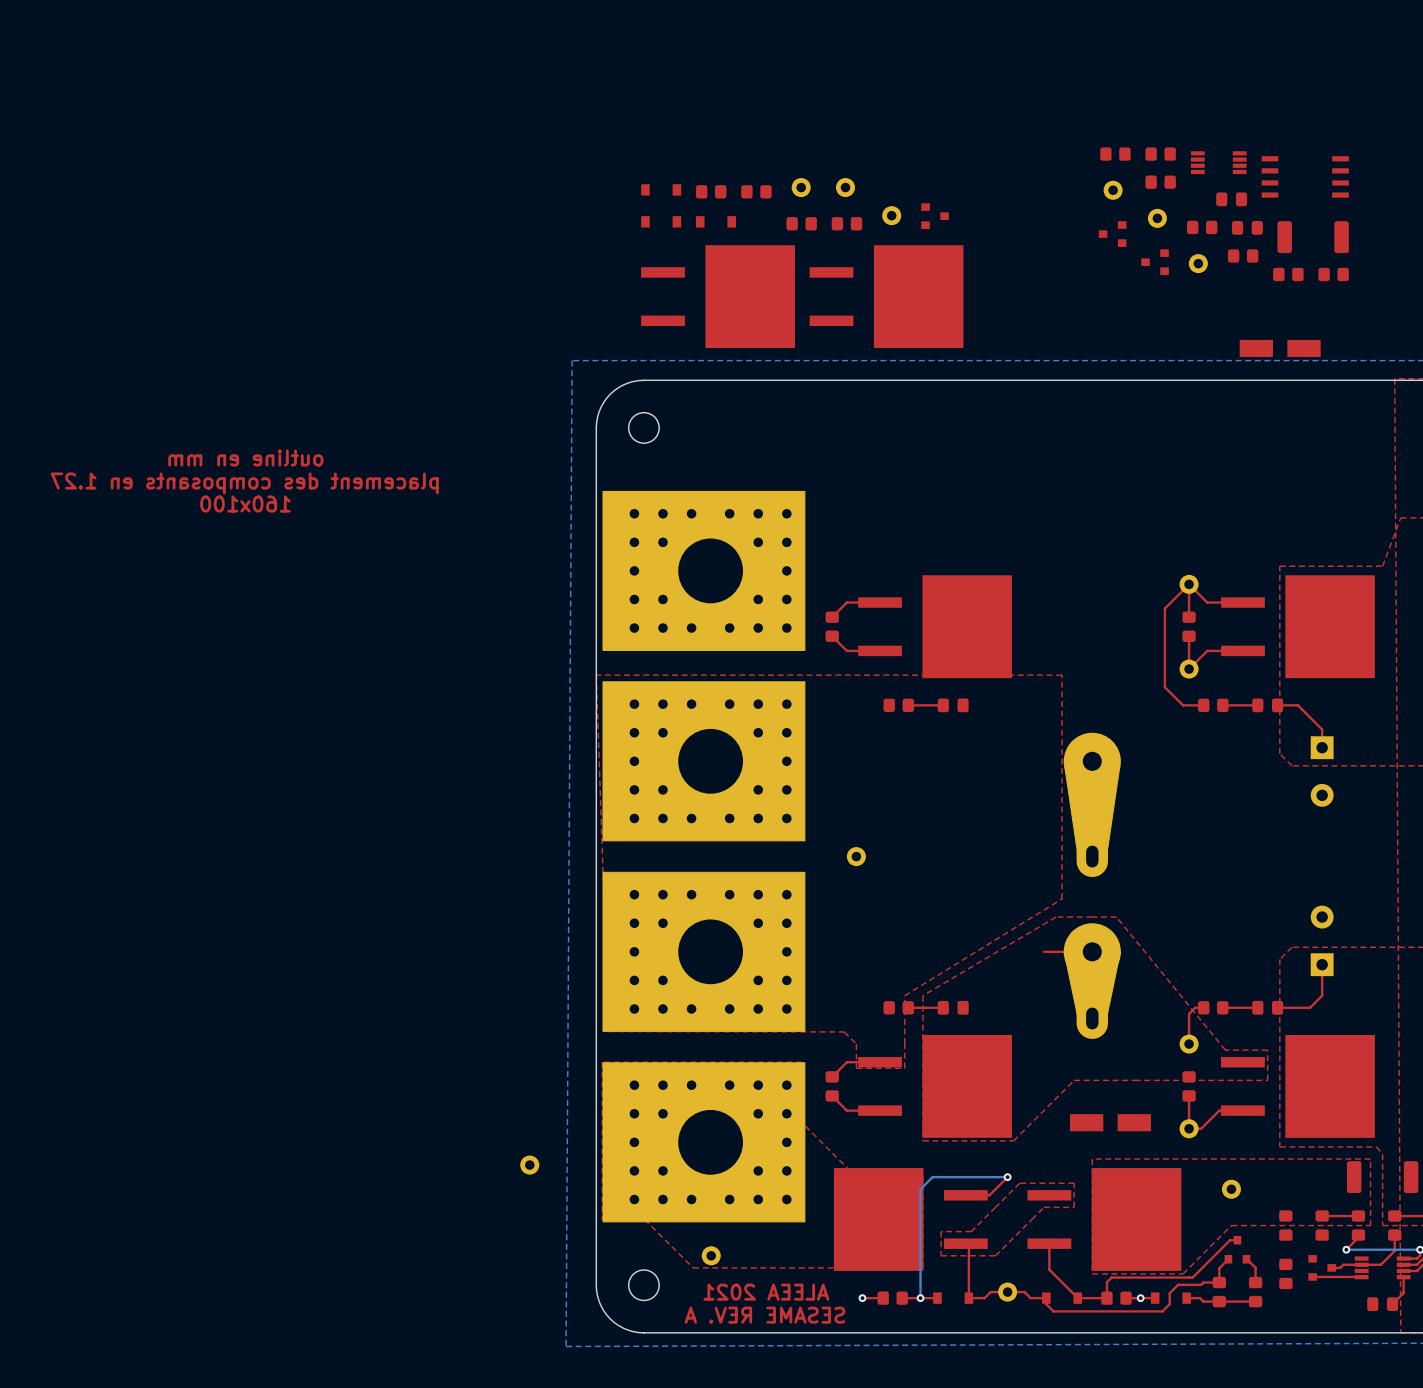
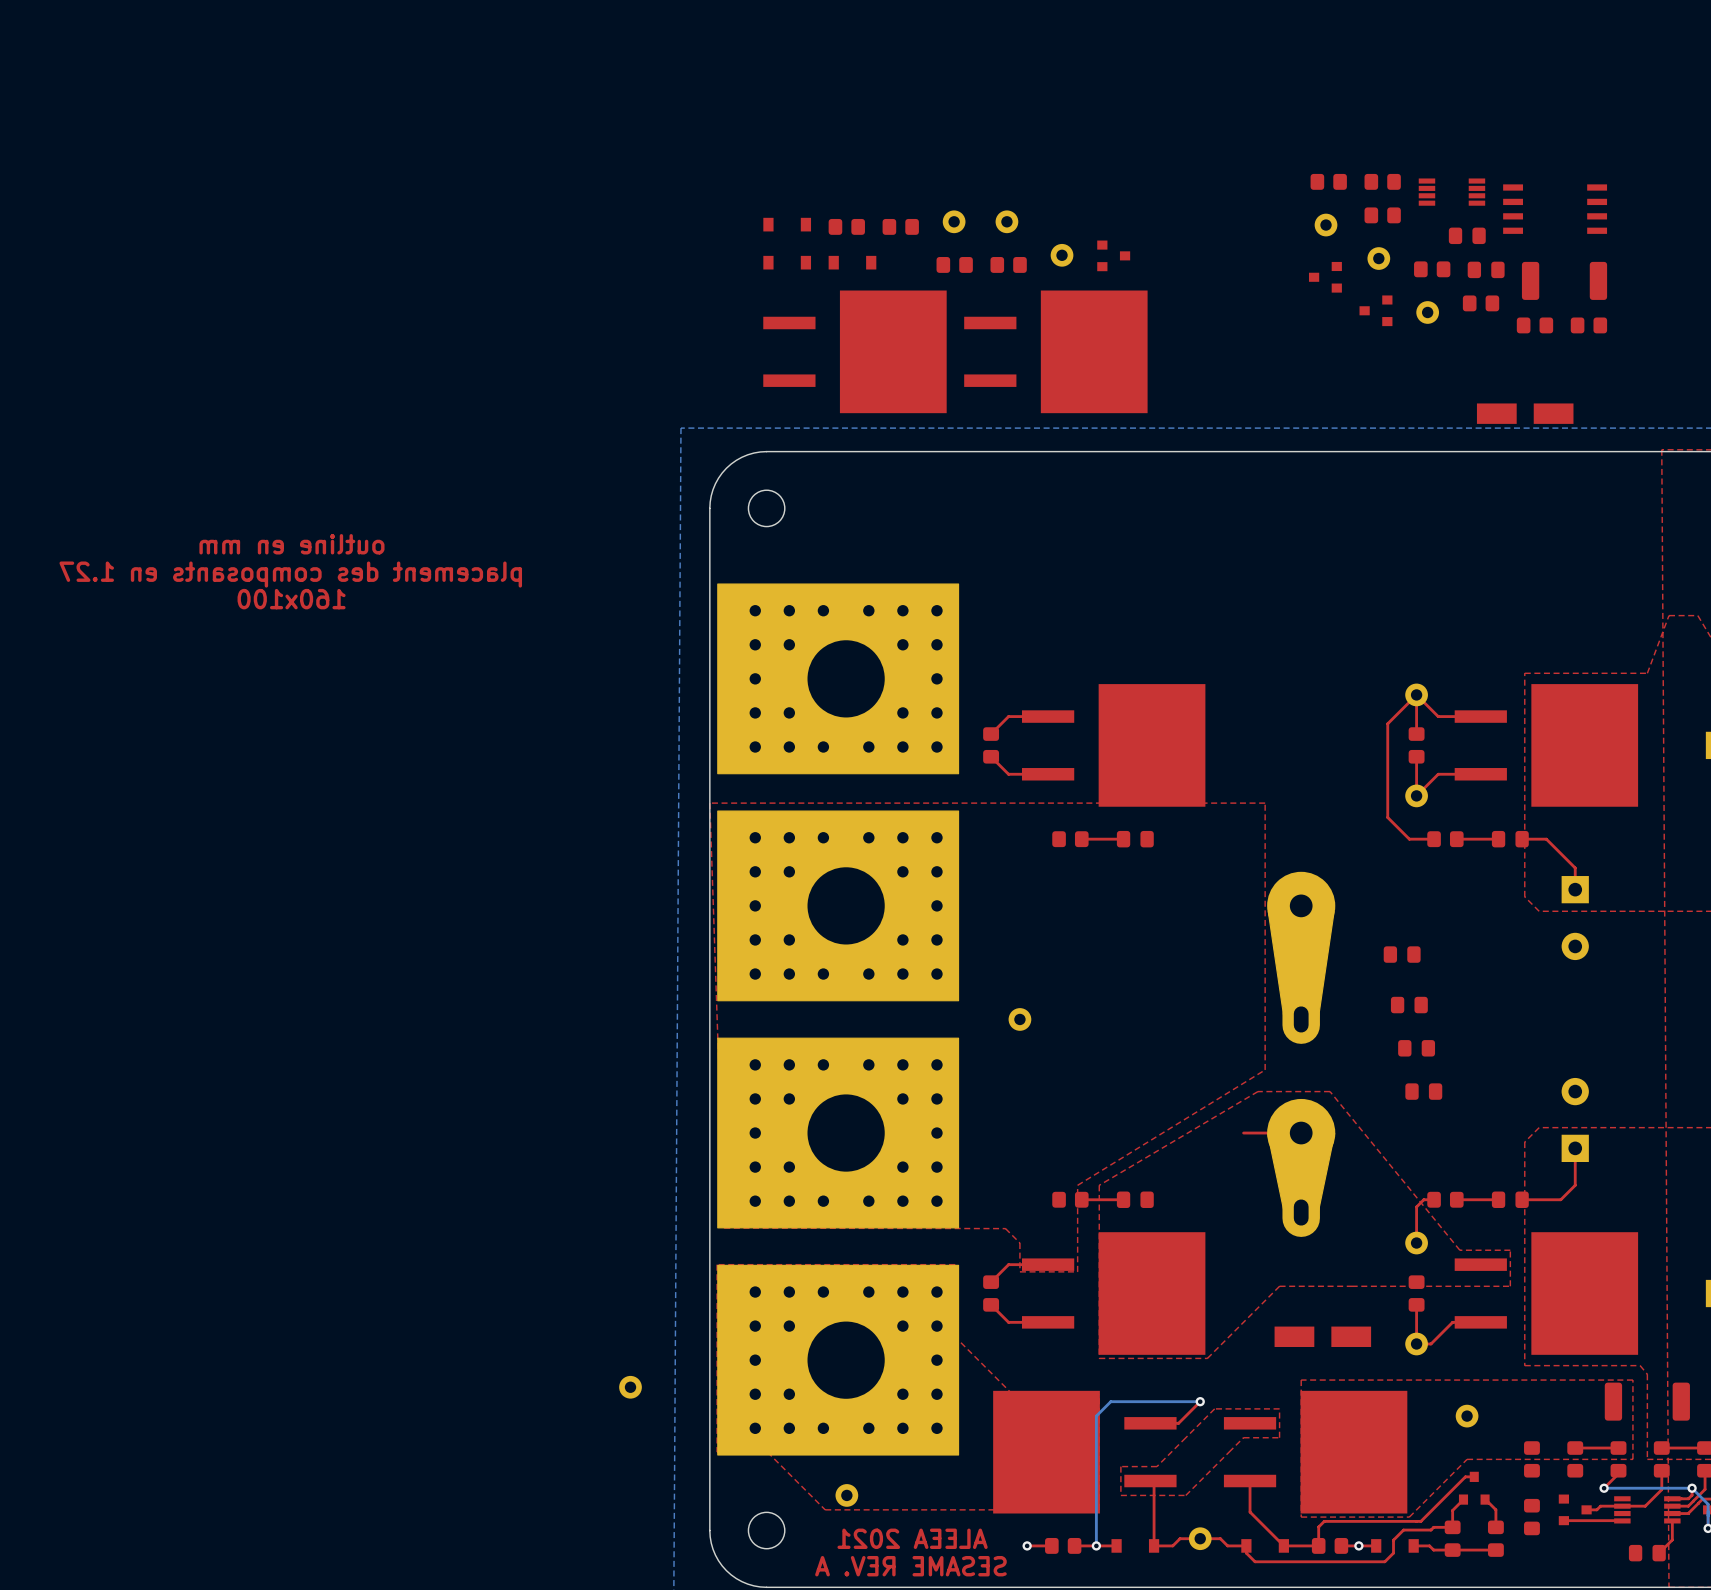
part: none -> (1402, 954)
part: none -> (1409, 1005)
part: none -> (1416, 1048)
part: none -> (1423, 1091)

